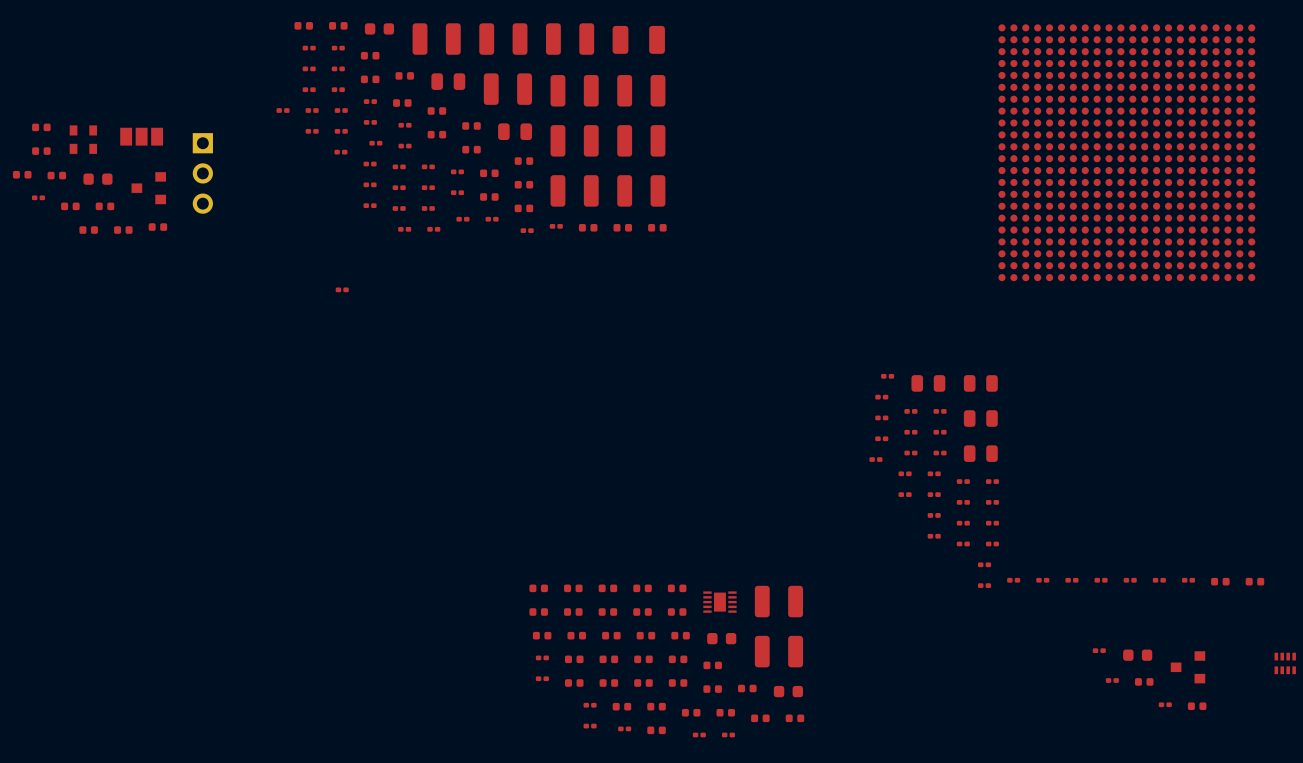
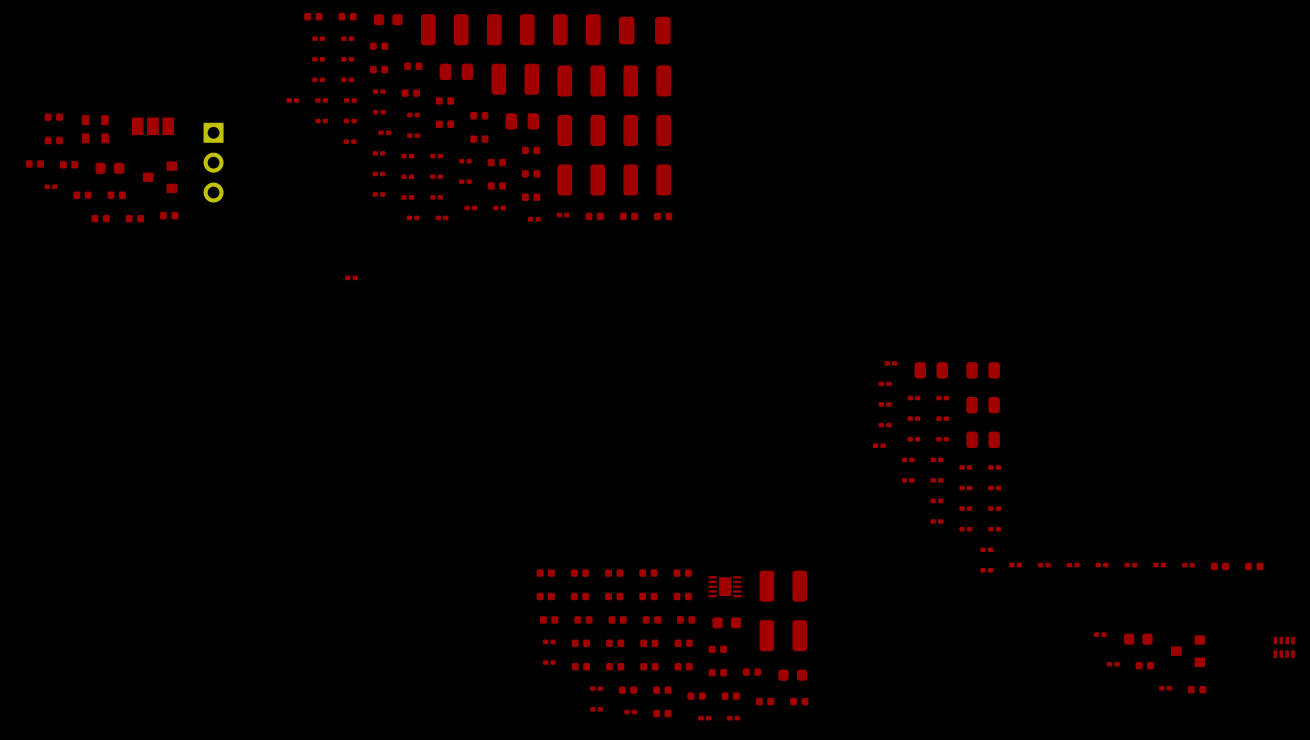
part: (1126, 152) -> none

